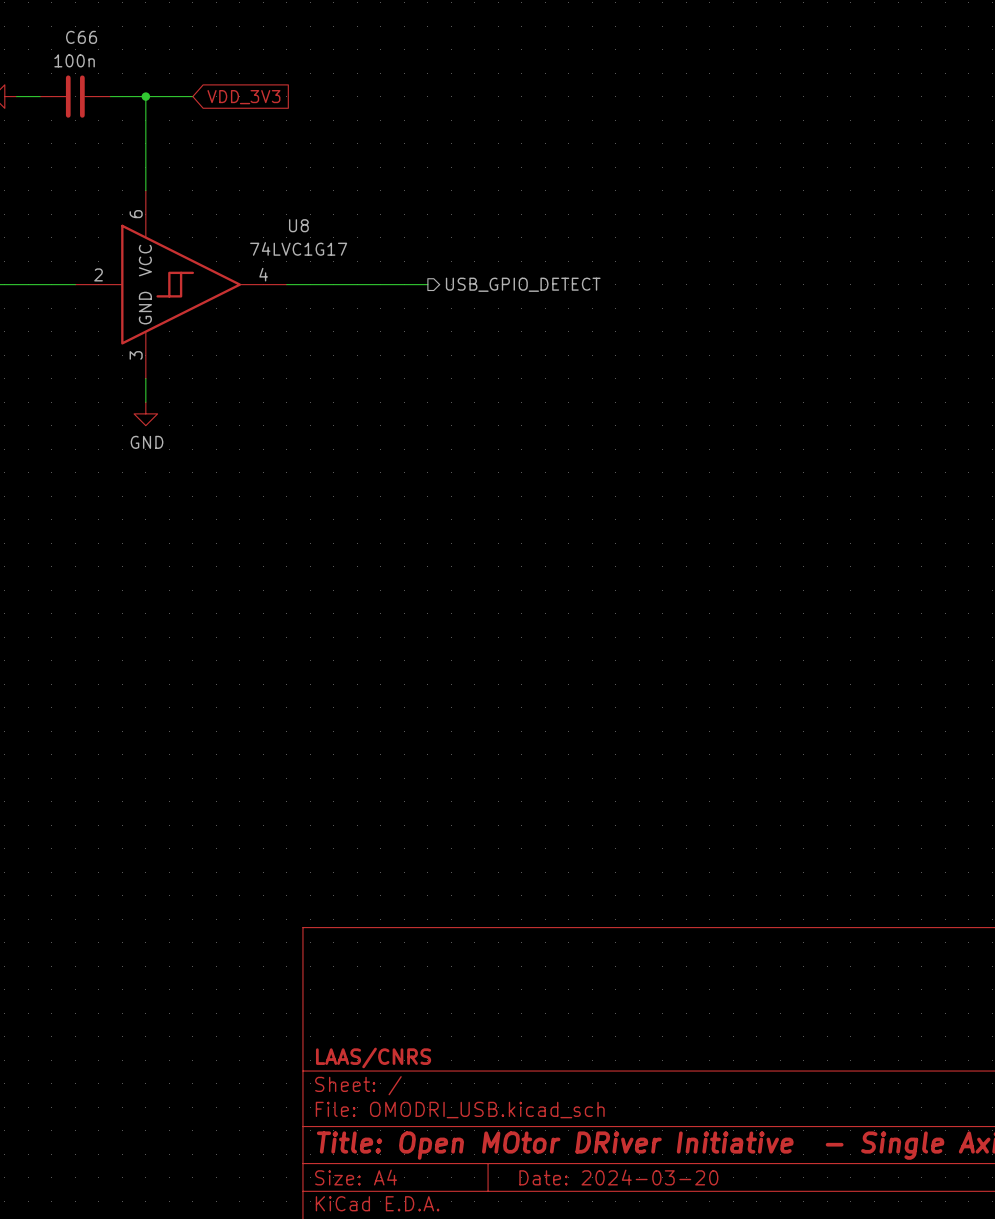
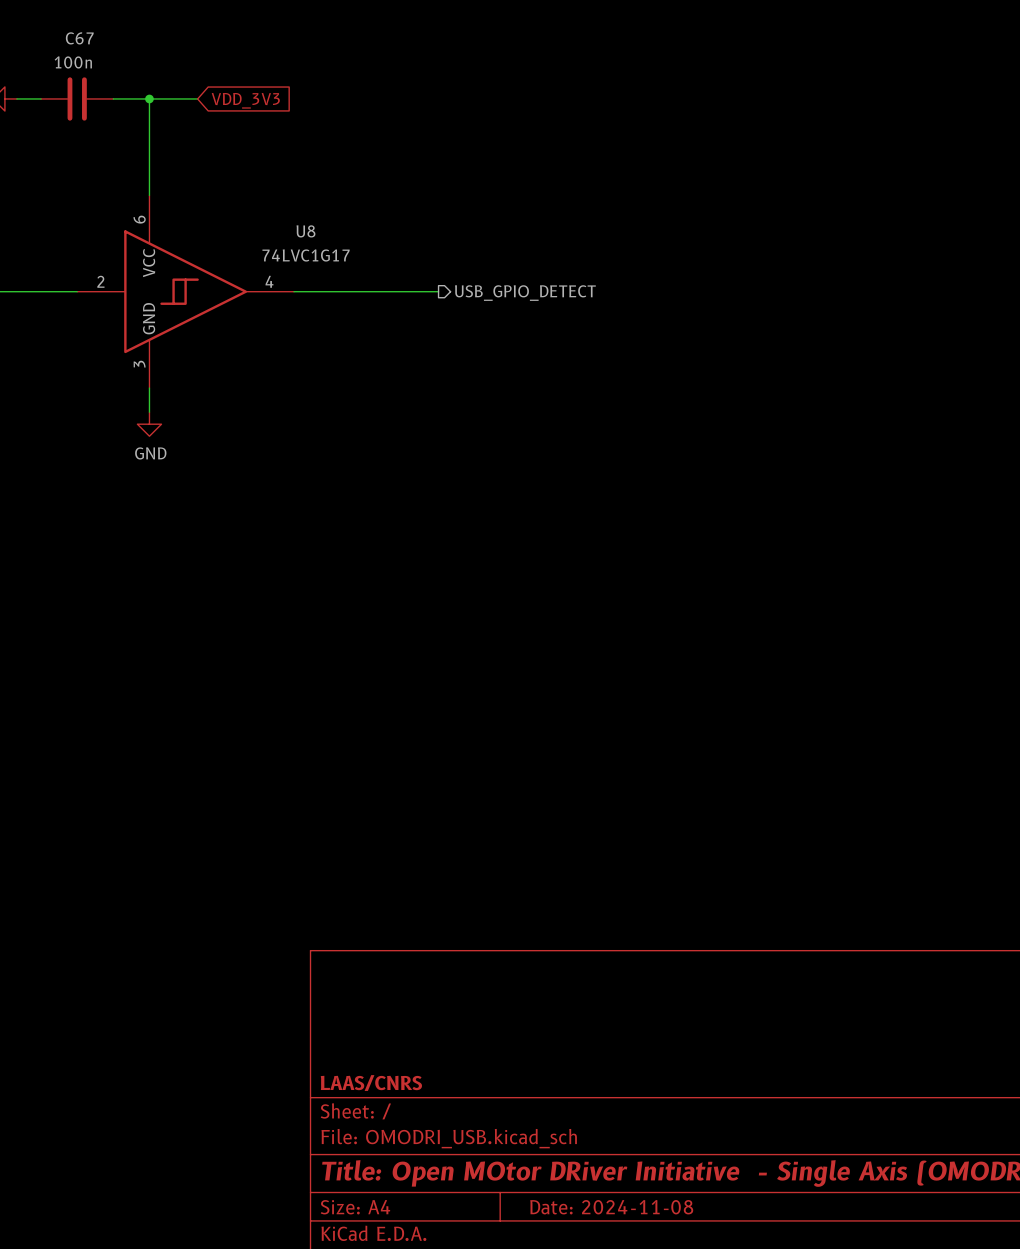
C66 name: C66 (81, 37) -> C67 (79, 38)
title block: Date: 2024-03-20 (618, 1177) -> Date: 2024-11-08 (611, 1207)

